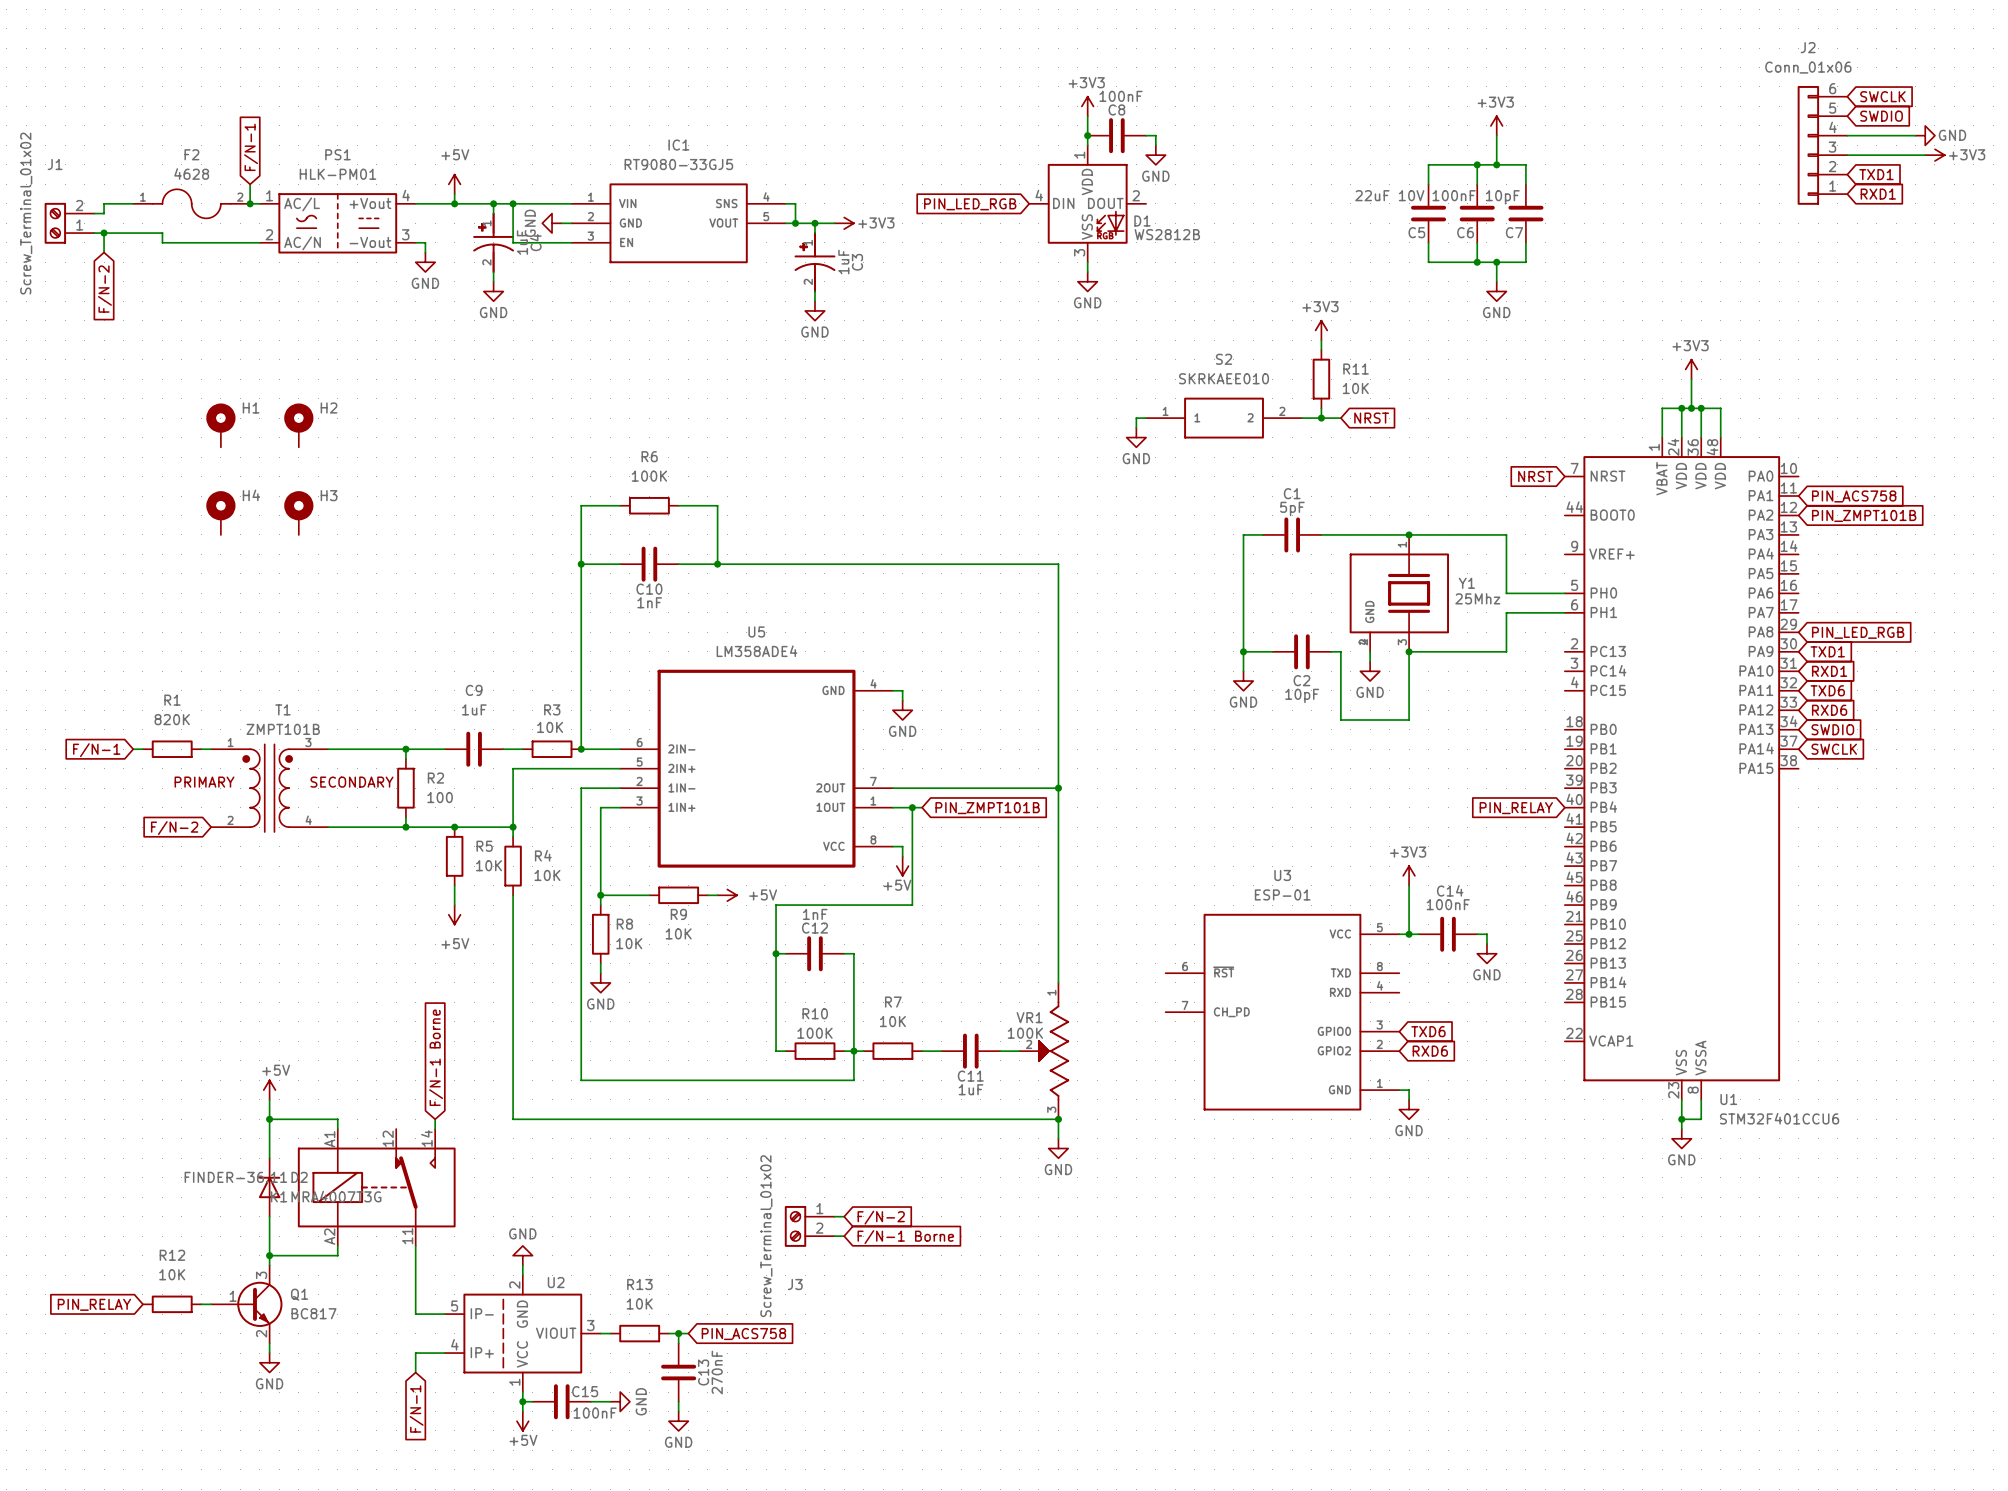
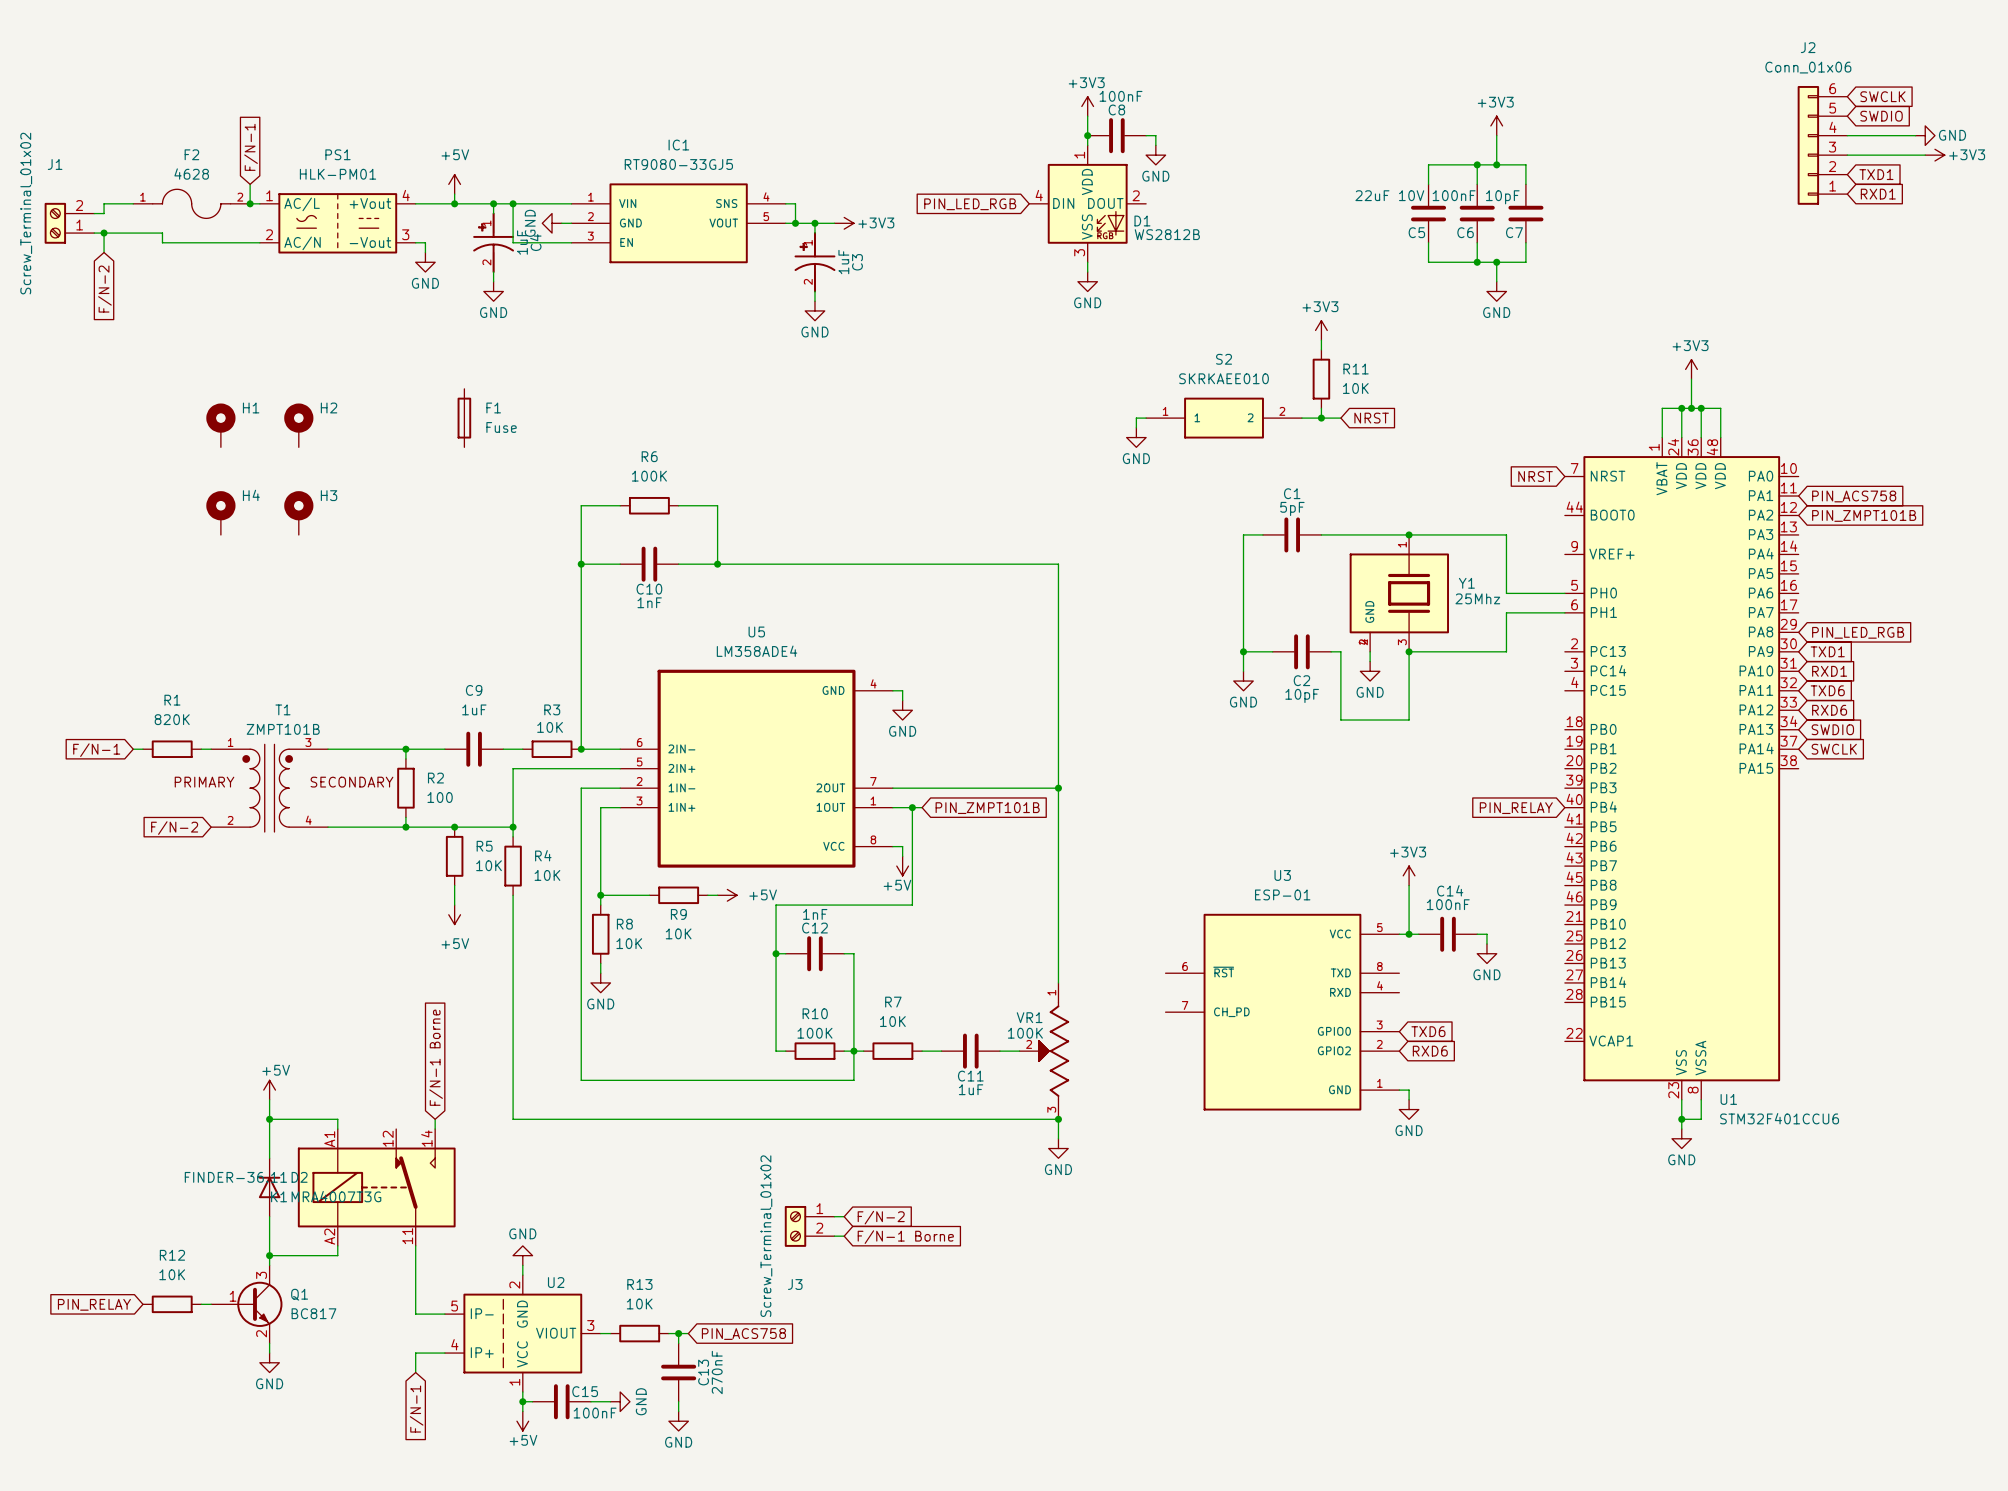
F1: none -> Fuse (464, 418)

